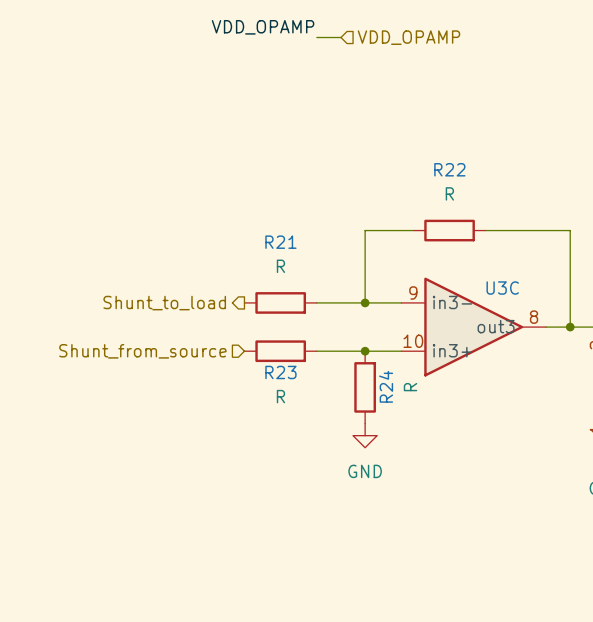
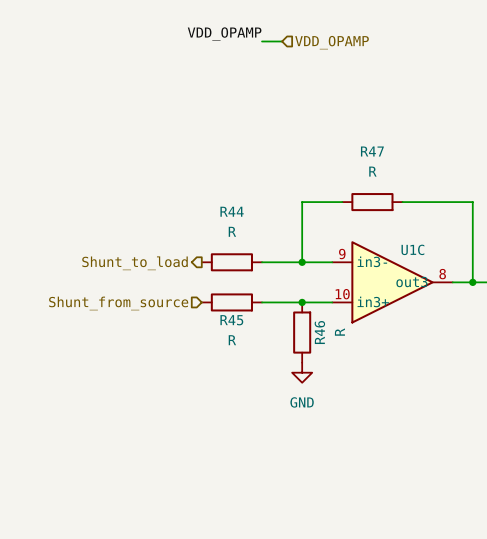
R22 name: R22 (449, 169) -> R47 (372, 151)
R21 name: R21 (280, 242) -> R44 (232, 211)
U3C name: U3C (502, 288) -> U1C (412, 249)
R23 name: R23 (280, 372) -> R45 (231, 320)
R24 name: R24 (386, 386) -> R46 (319, 332)

